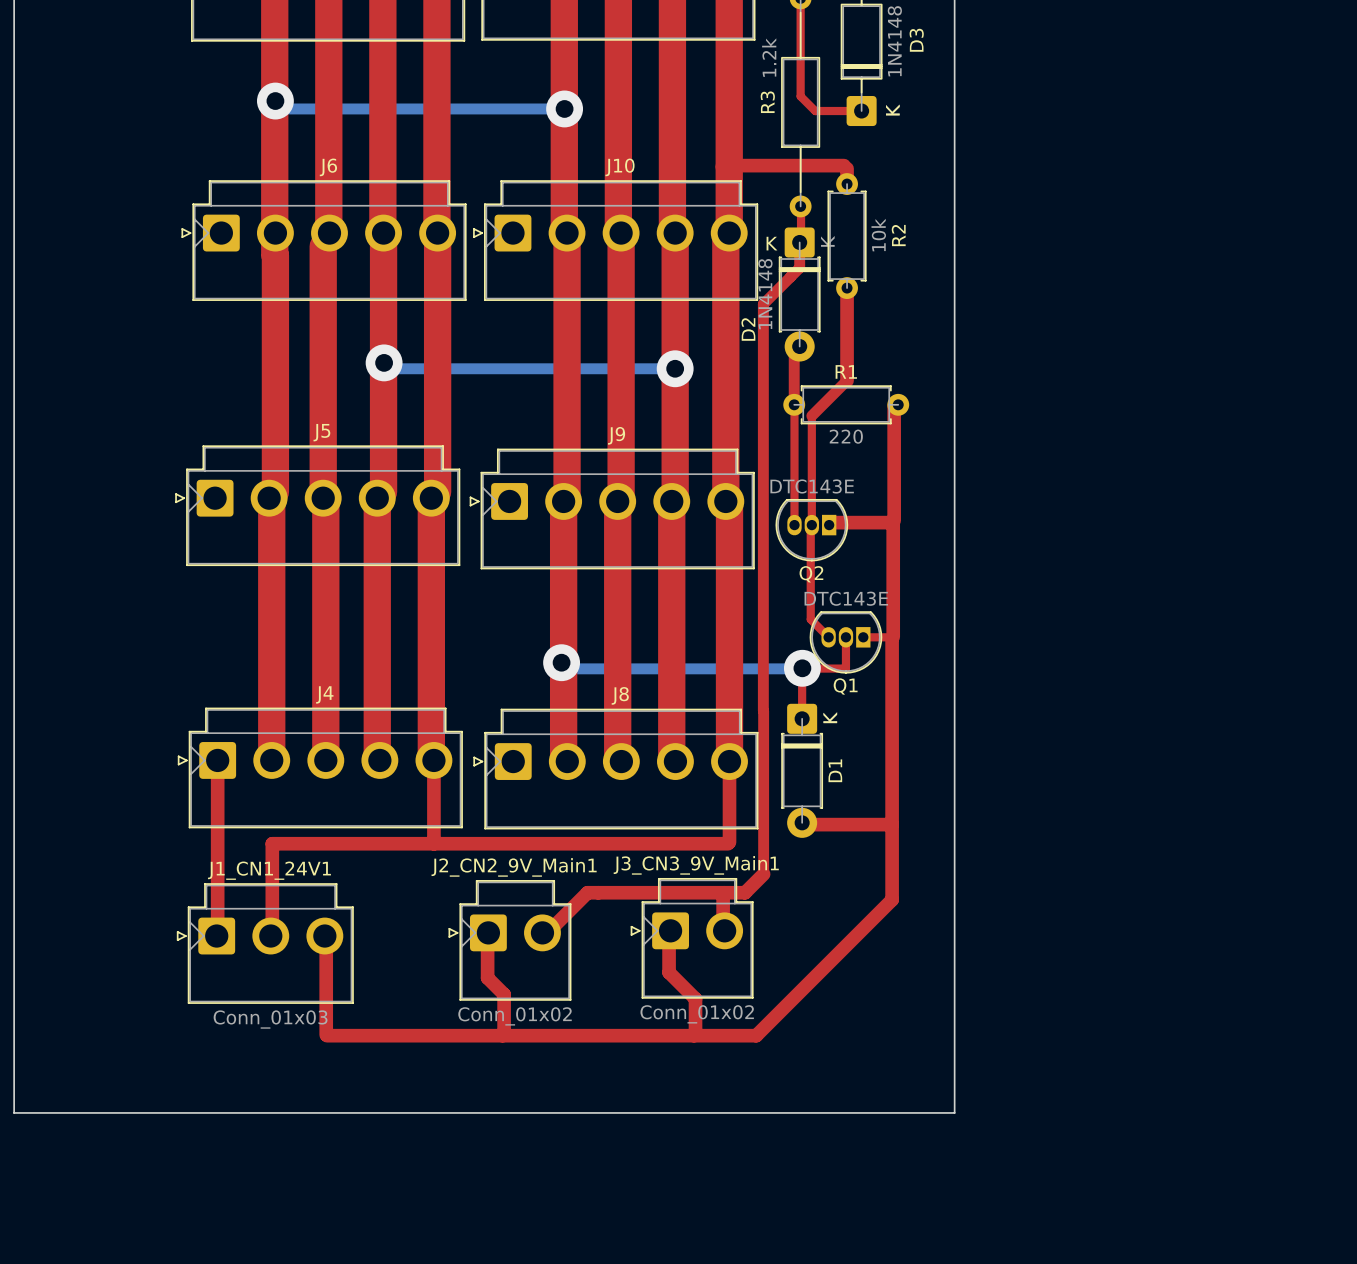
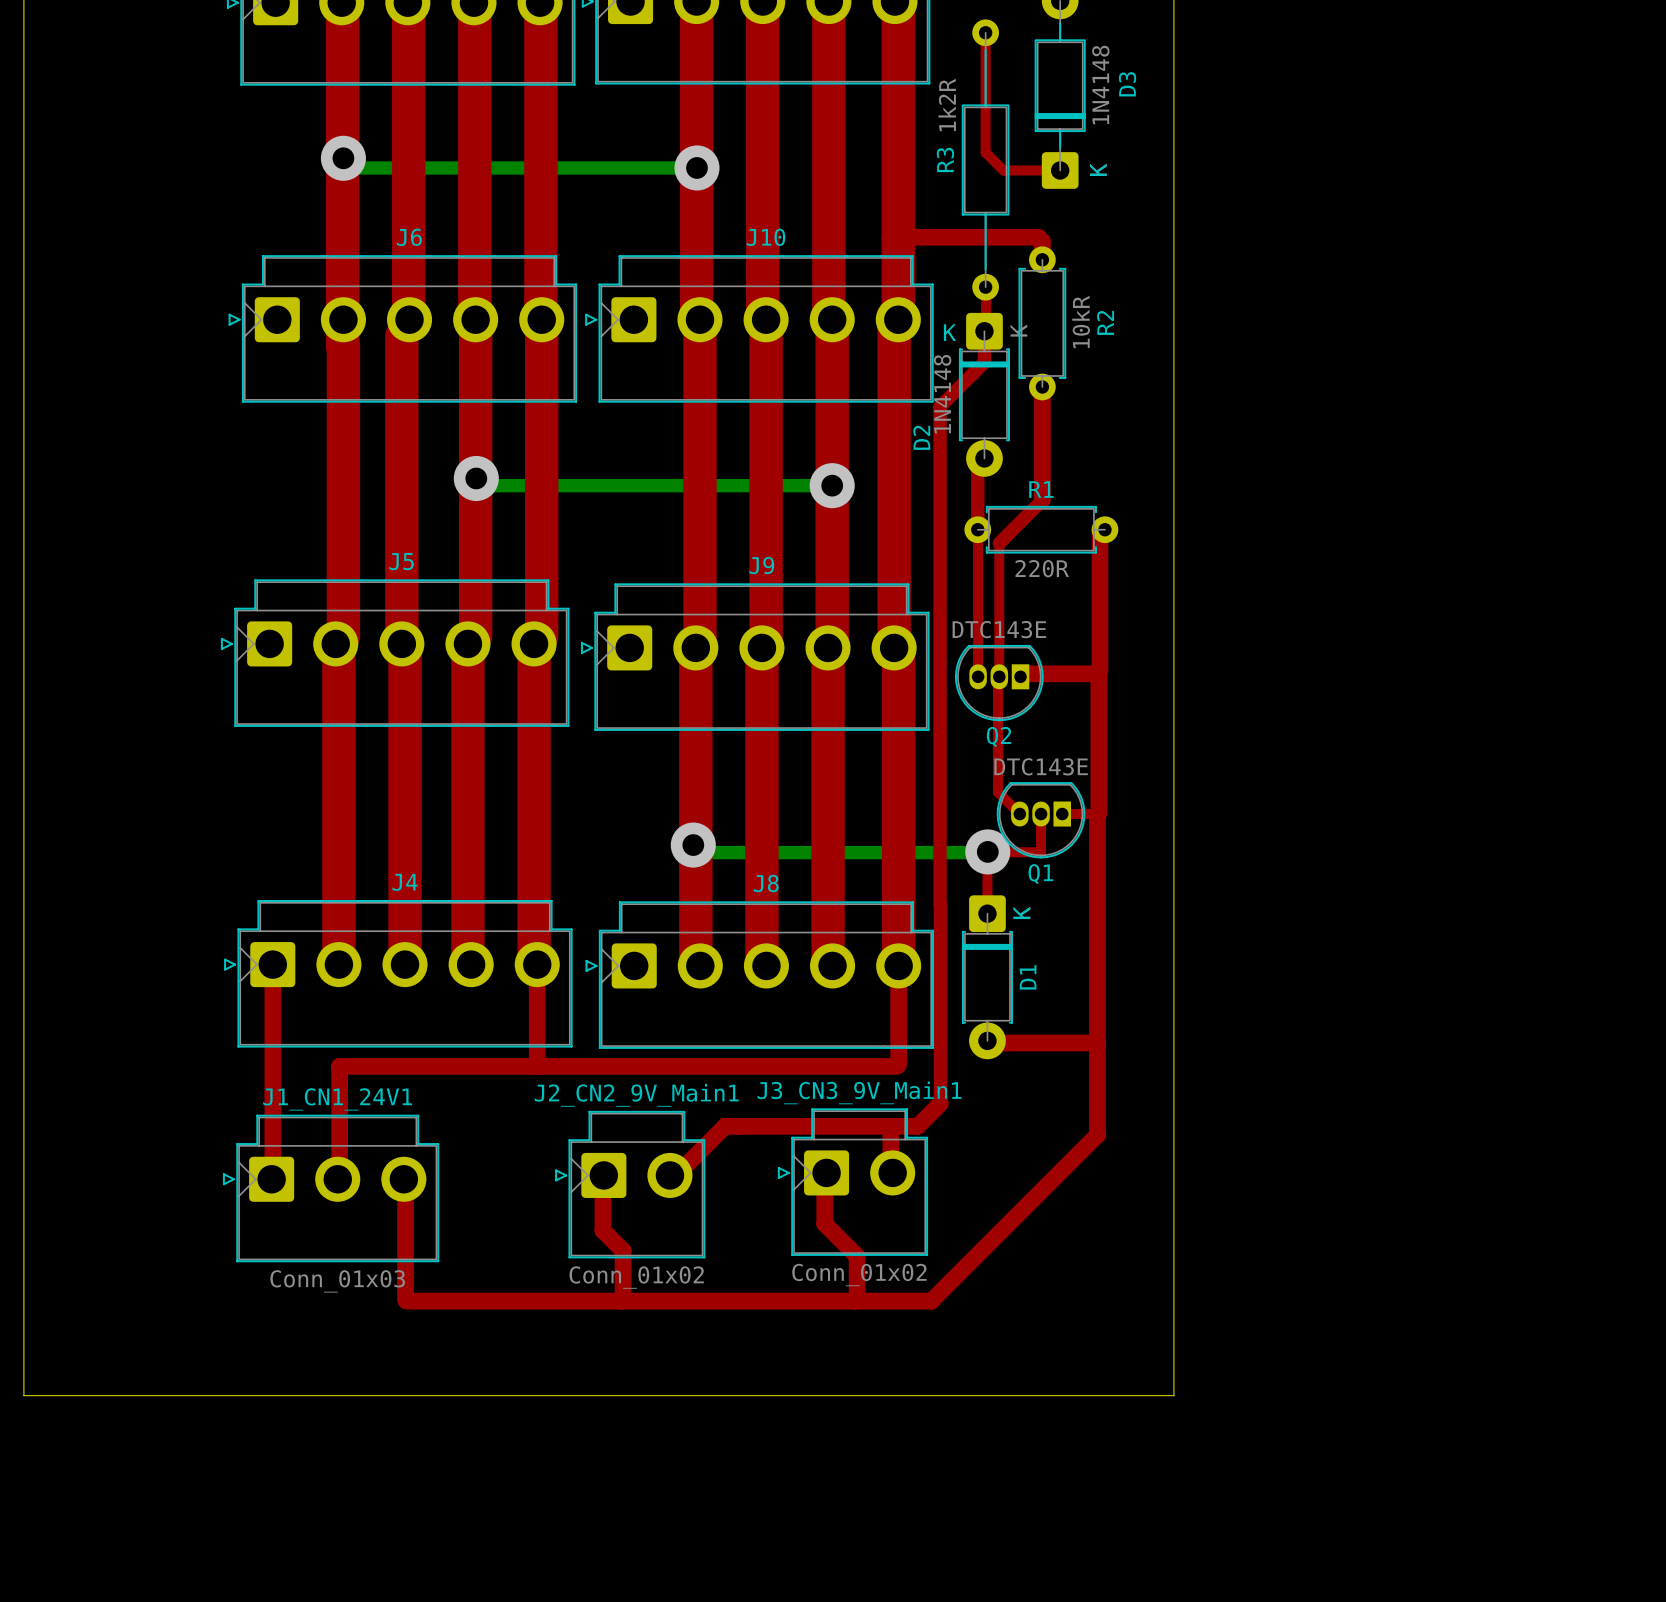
R3 value: 1.2k (769, 57) -> 1k2R (947, 105)
R2 value: 10k (878, 235) -> 10kR (1081, 322)
R1 value: 220 (846, 436) -> 220R (1042, 568)

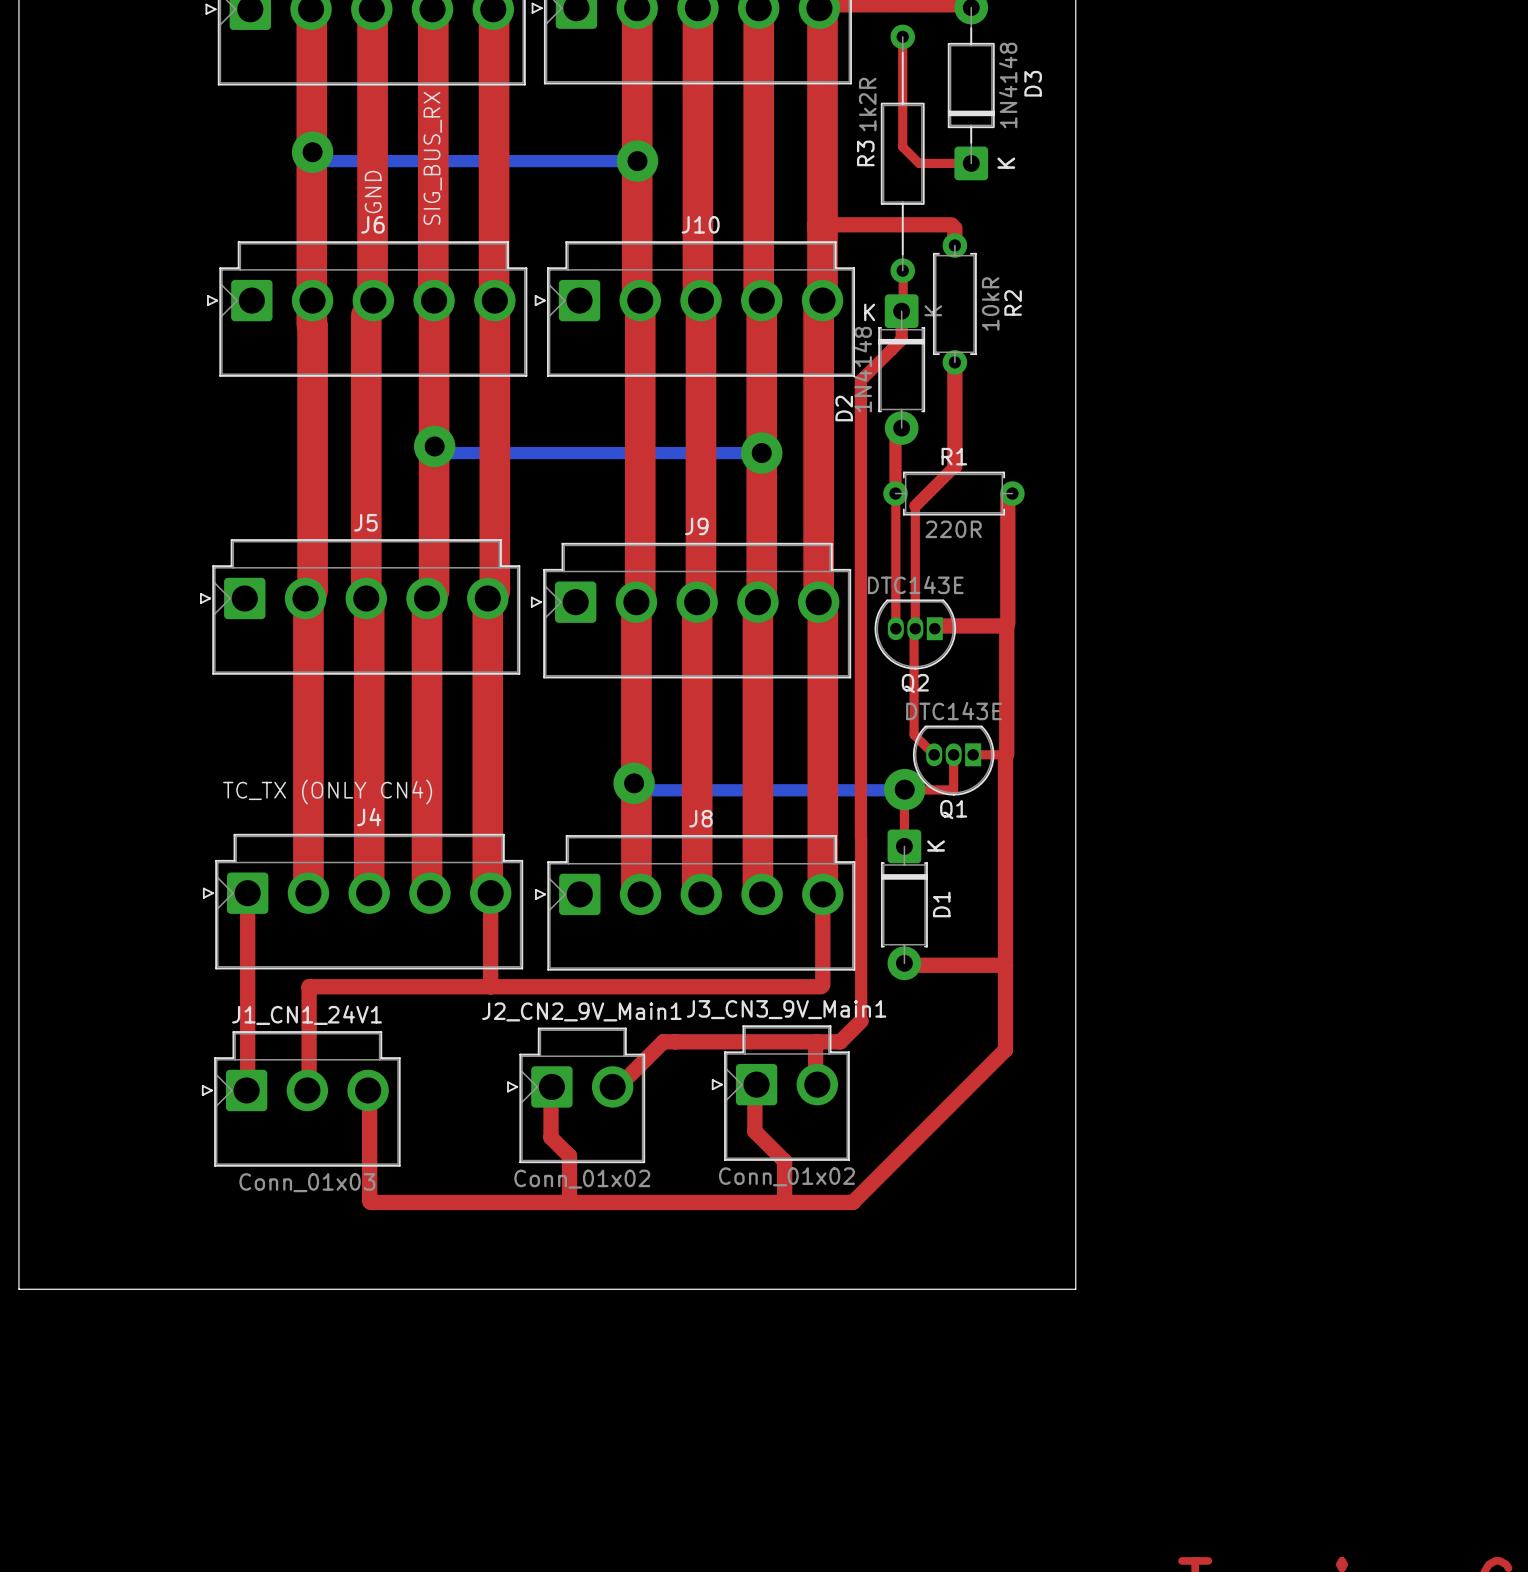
text: none -> SIG_BUS_RX (432, 158)
text: none -> GND (373, 192)
text: none -> TC_TX (ONLY CN4) (327, 792)

